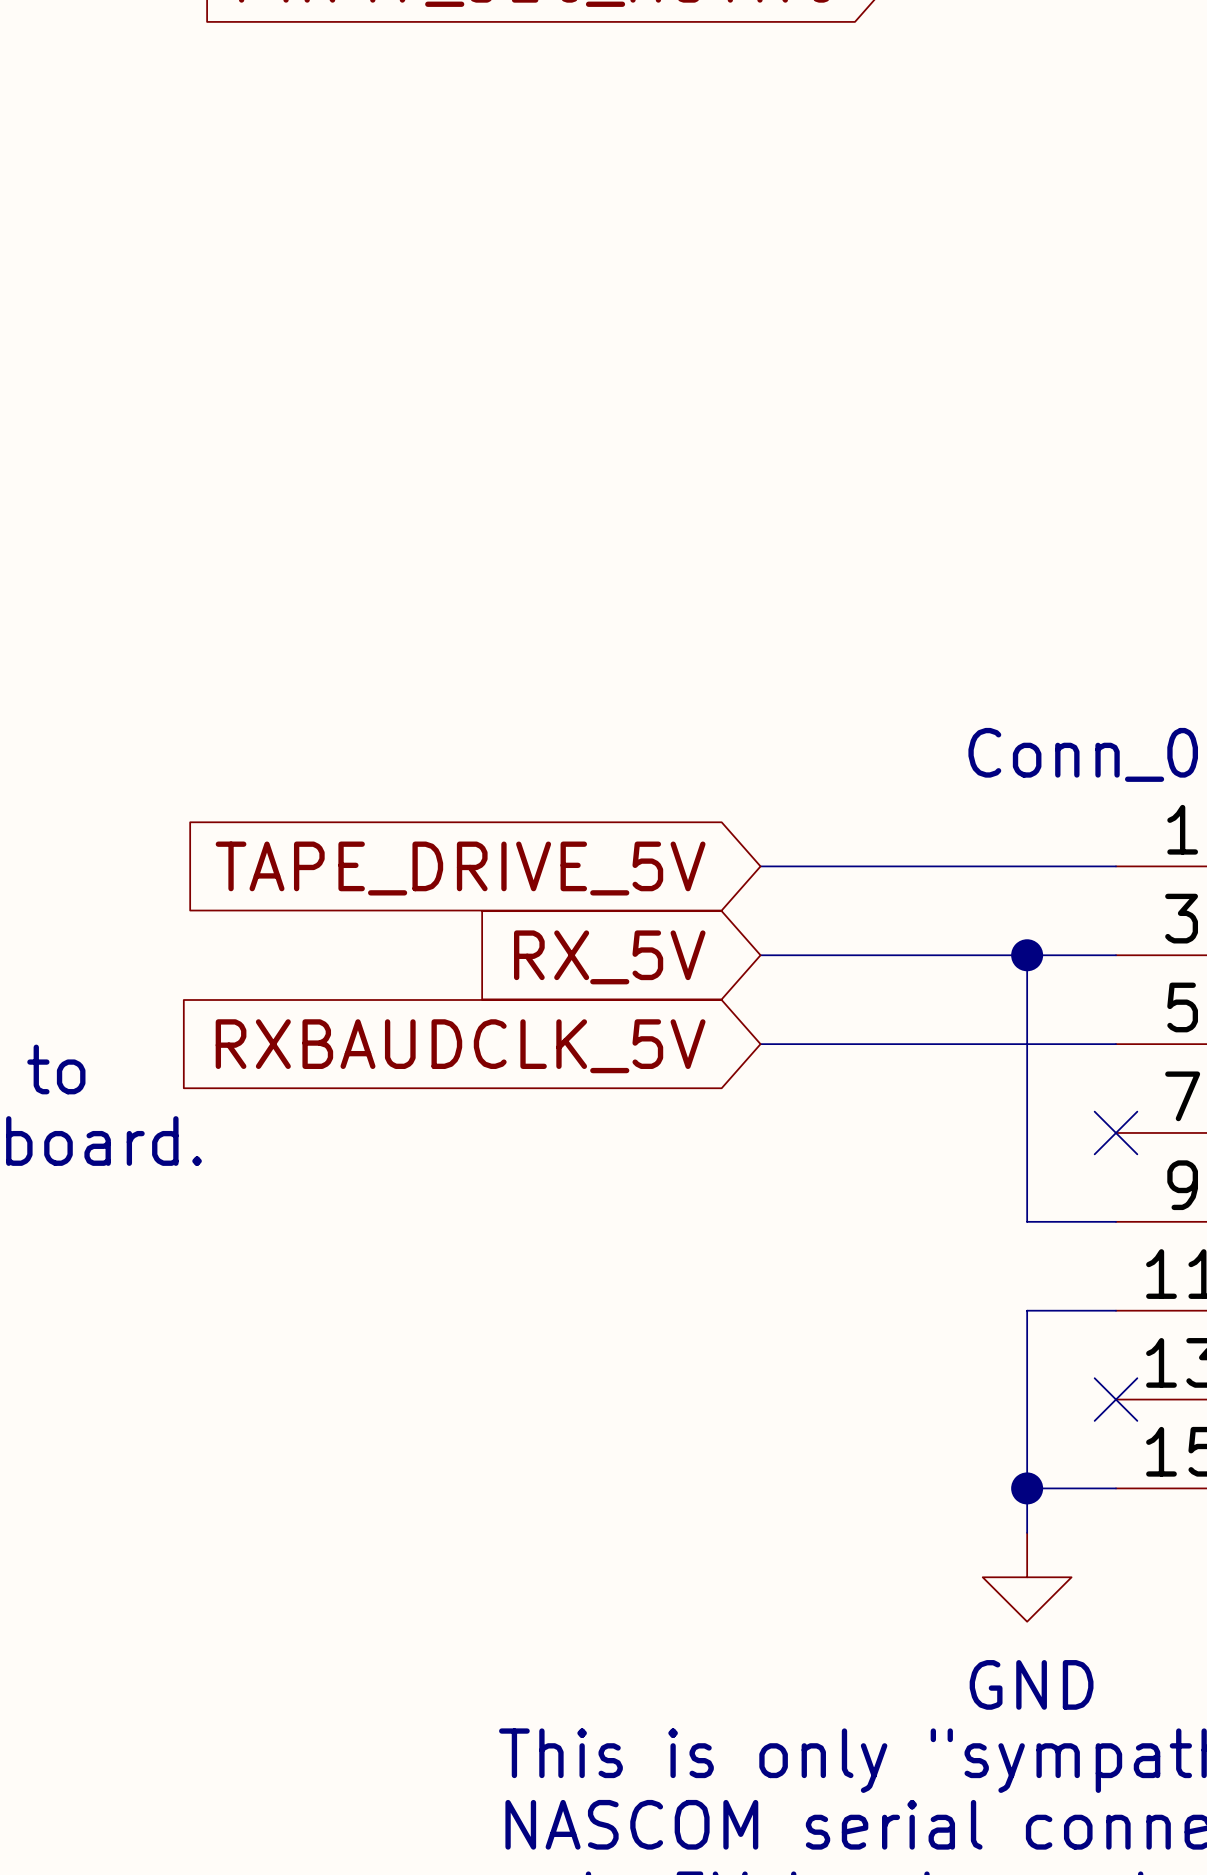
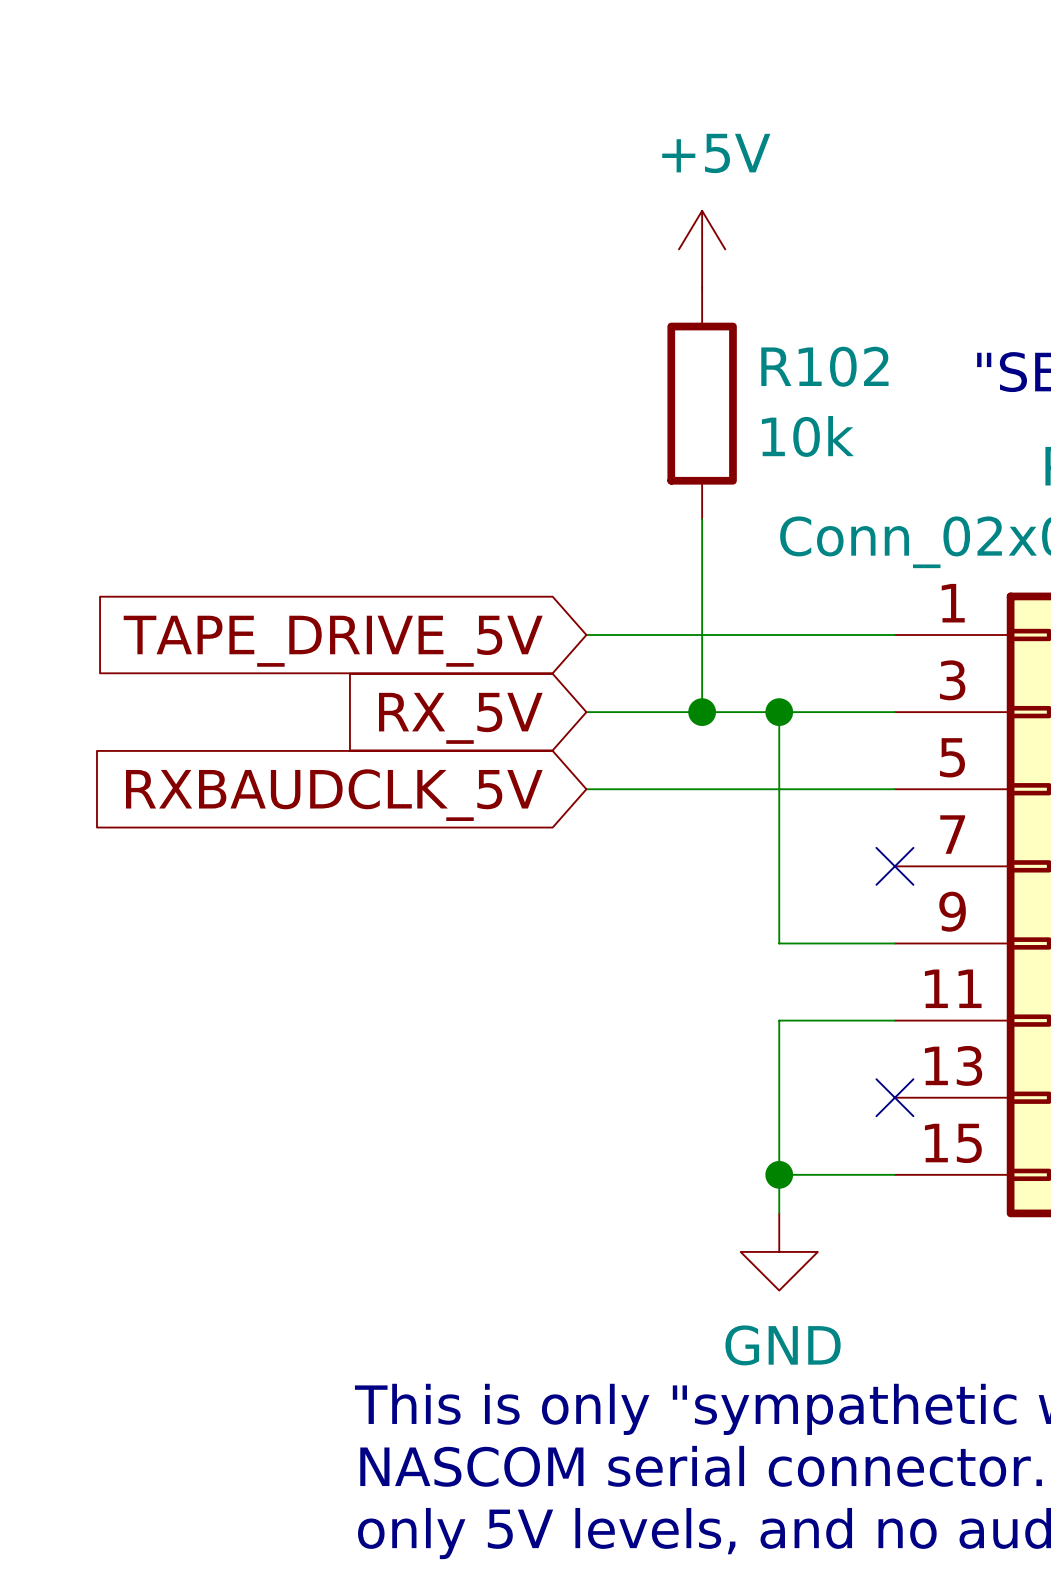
power symbol: none -> +5V (702, 249)
R102: none -> 10k (702, 403)
wire: none -> (702, 519) (702, 712)
junction: none -> (702, 712)
wire: (1027, 955) (1027, 1221) -> (779, 712) (779, 943) (817, 943)
junction position: (1027, 955) -> (779, 712)
wire: (1027, 1310) (1027, 1532) -> (817, 1020) (779, 1020) (779, 1213)
wire: none -> (779, 1174) (817, 1174)
junction position: (1027, 1488) -> (779, 1174)
power symbol position: GND (1027, 1577) -> GND (779, 1251)

